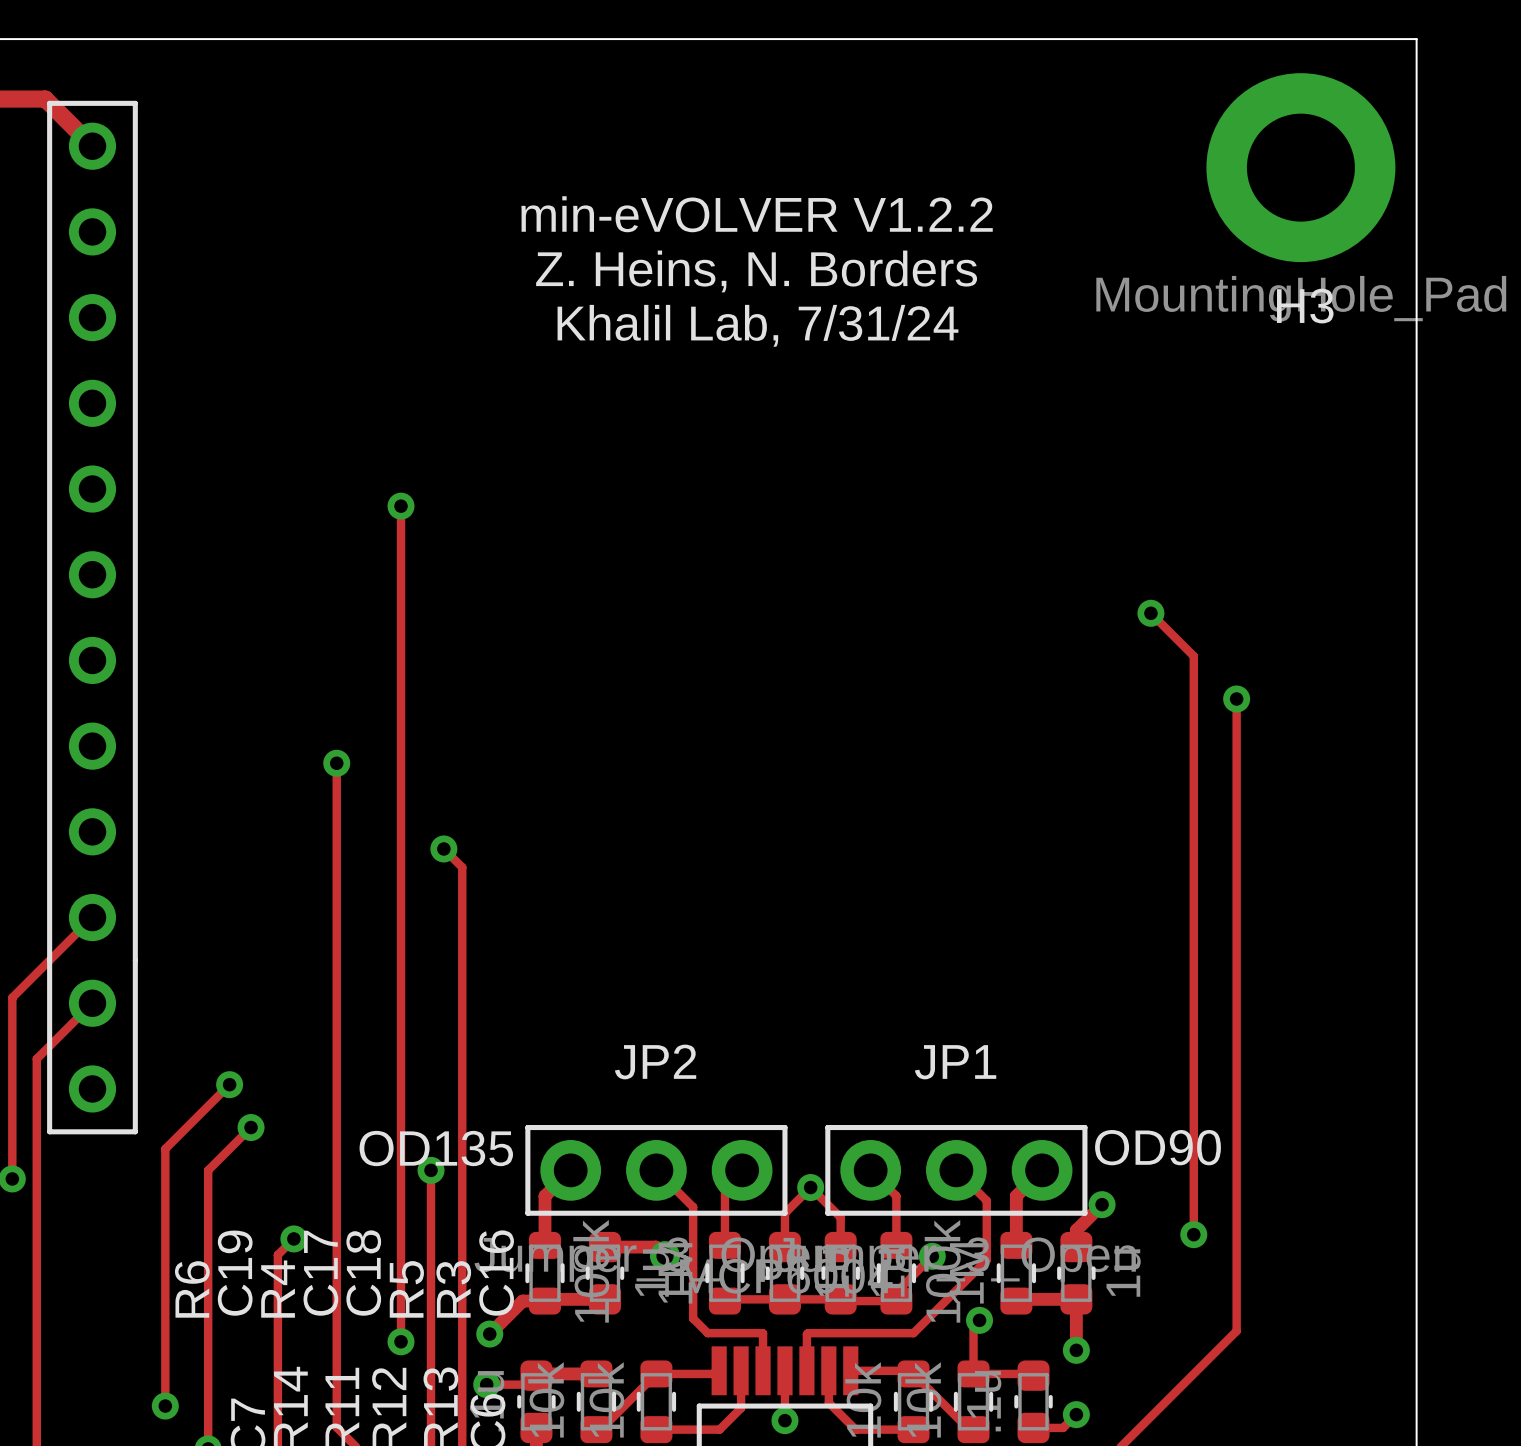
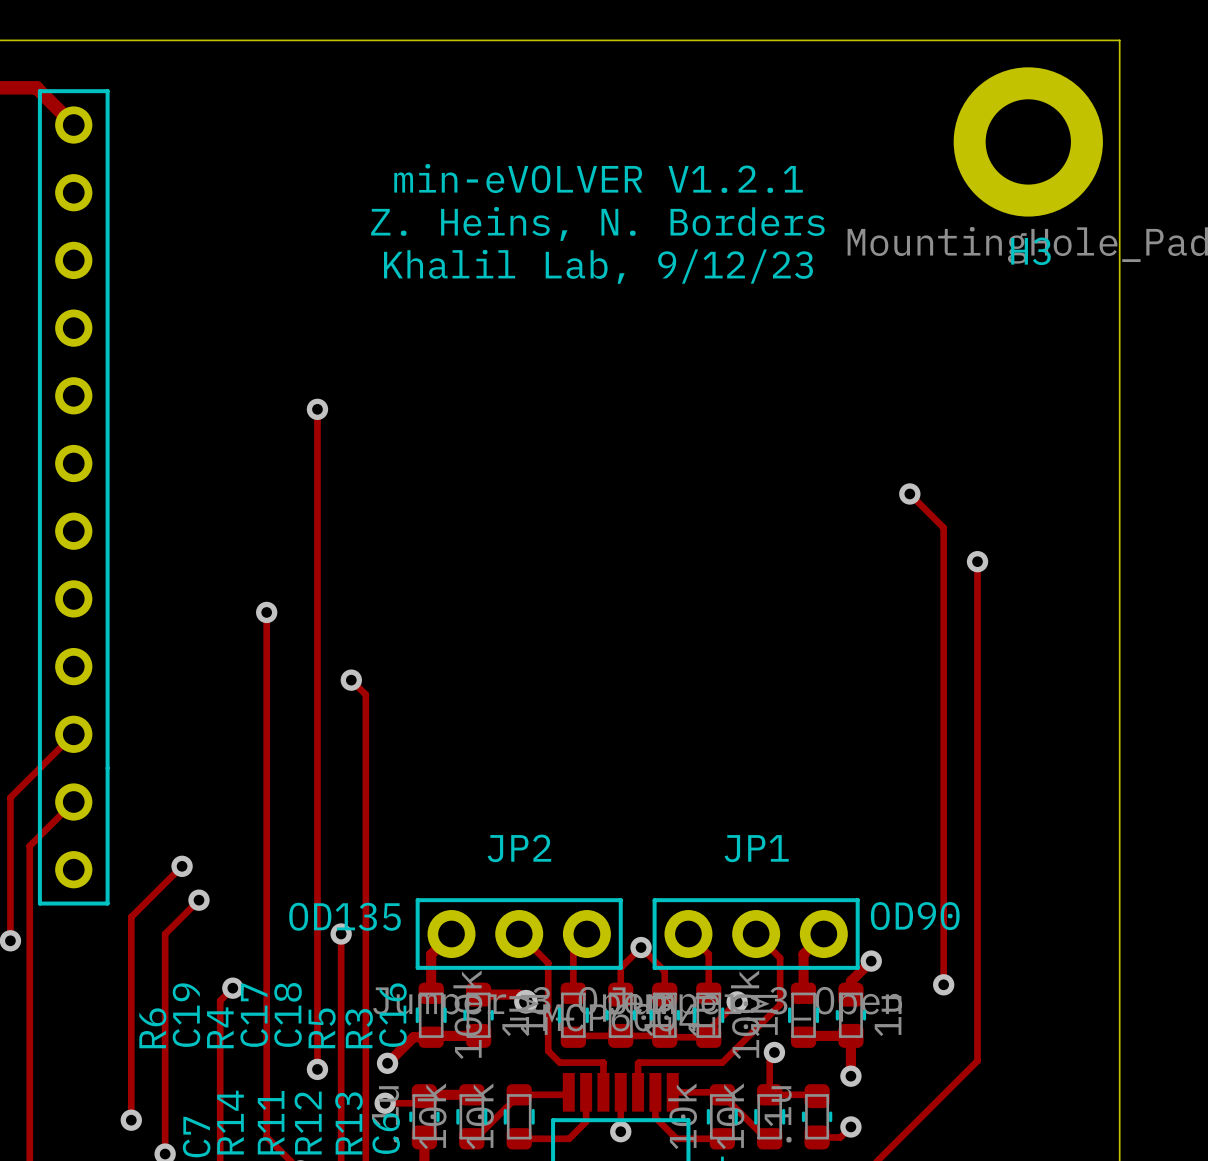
text: min-eVOLVER V1.2.2 (757, 214) -> min-eVOLVER V1.2.1 (598, 178)
text: Khalil Lab, 7/31/24 (757, 325) -> Khalil Lab, 9/12/23 (598, 266)

